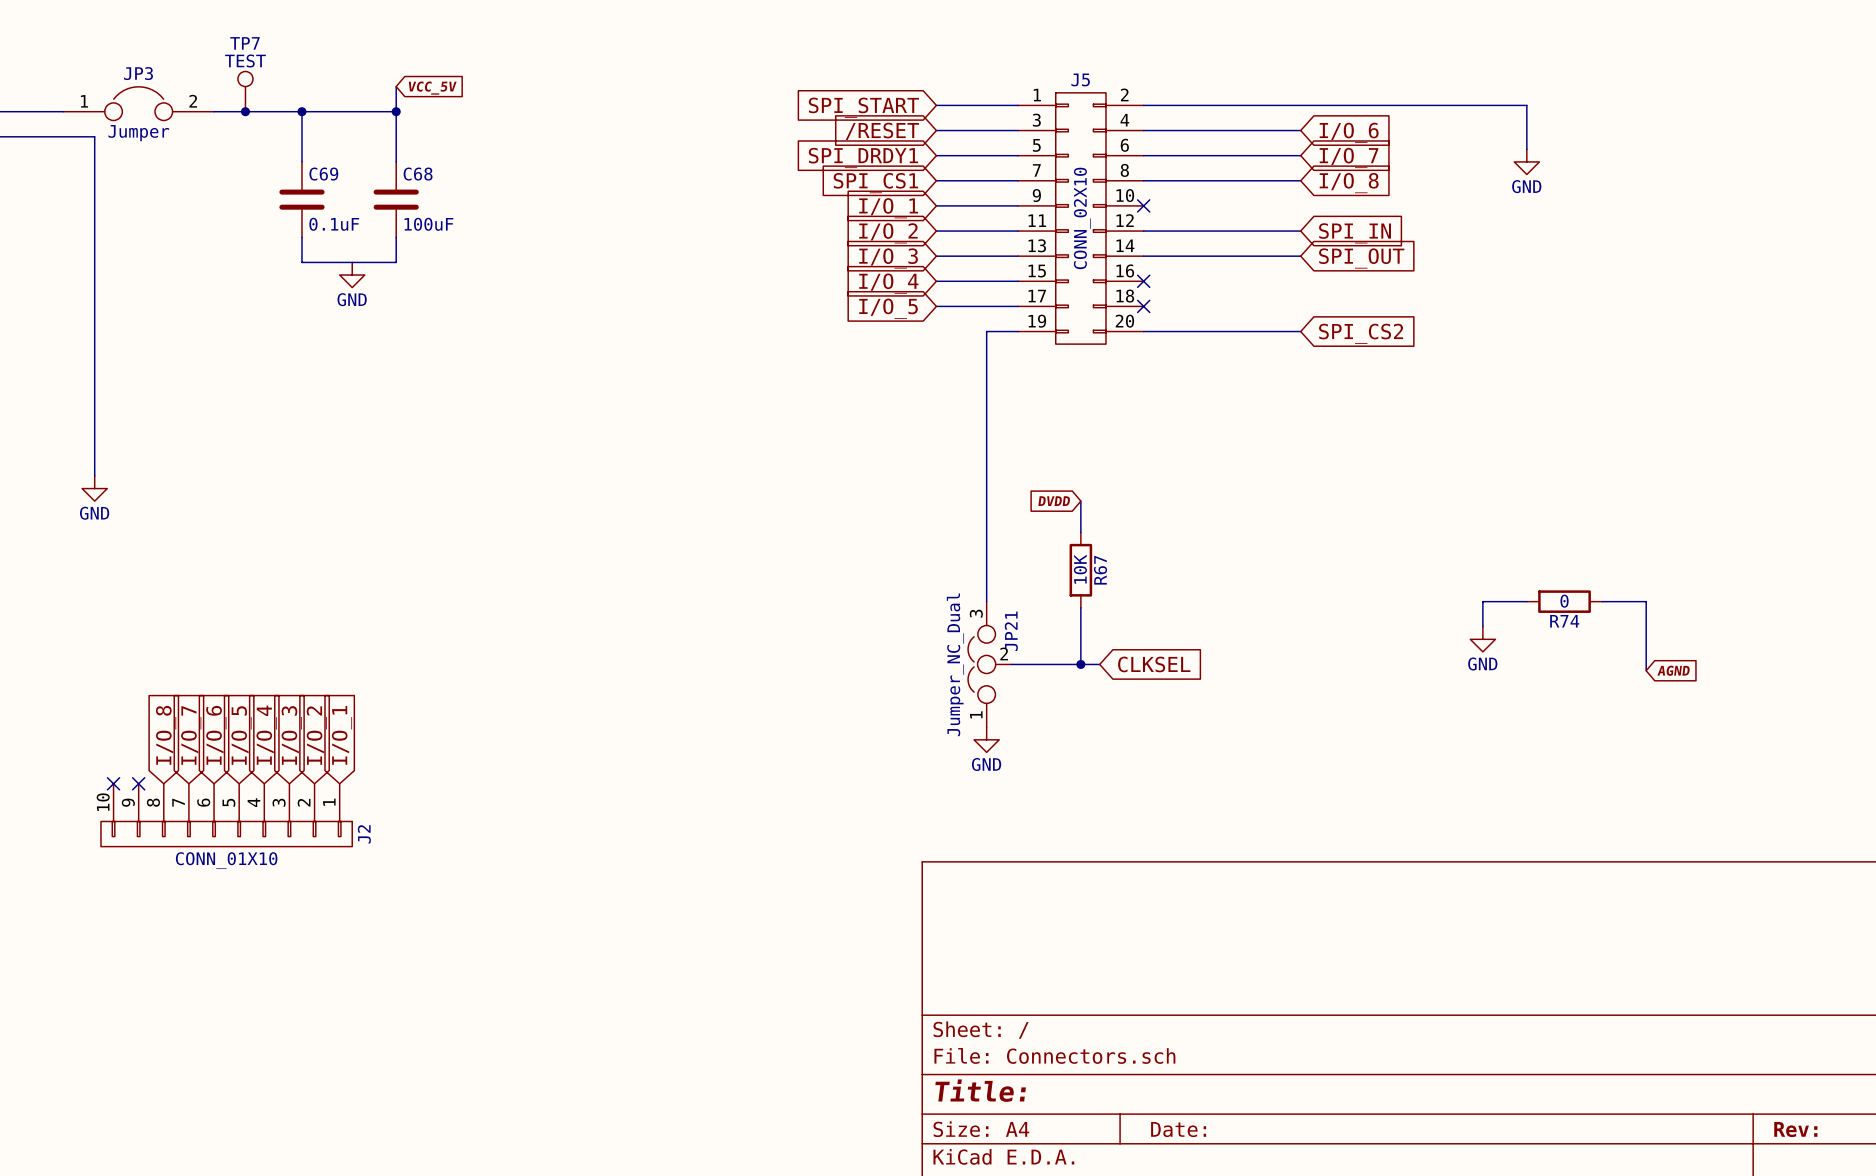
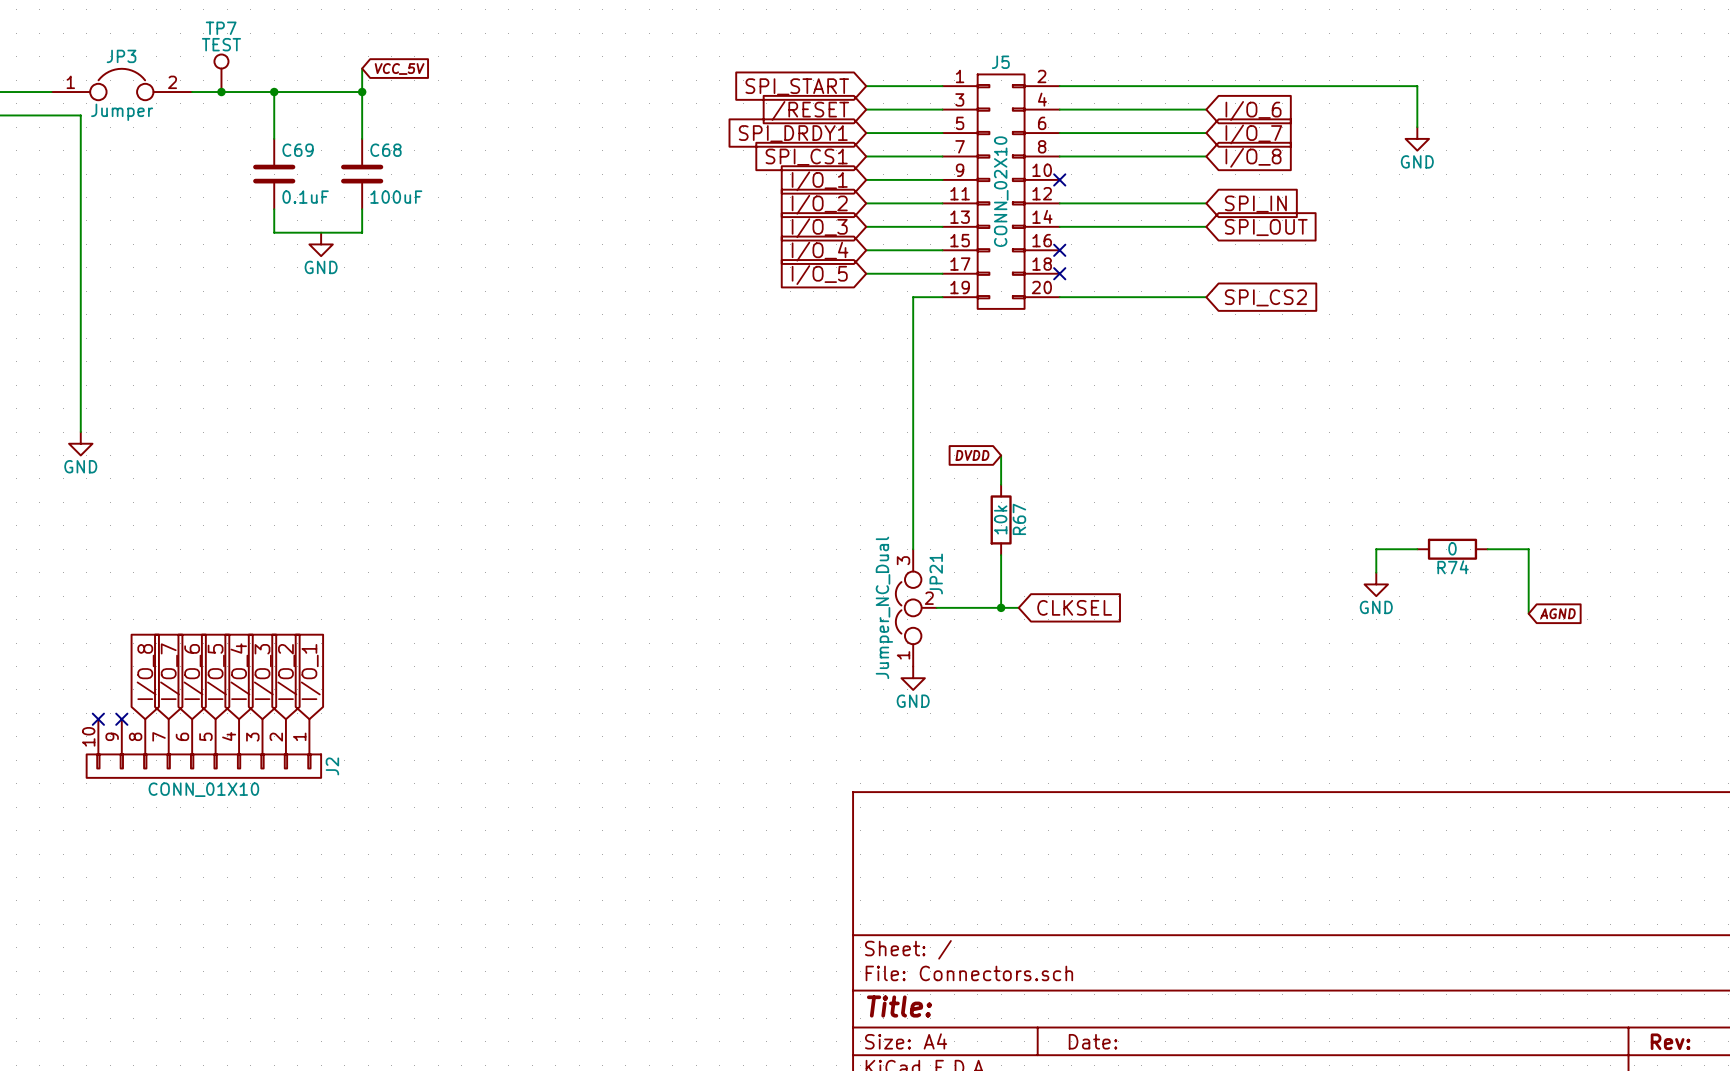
R67 value: 10K (1080, 569) -> 10k (1000, 519)

